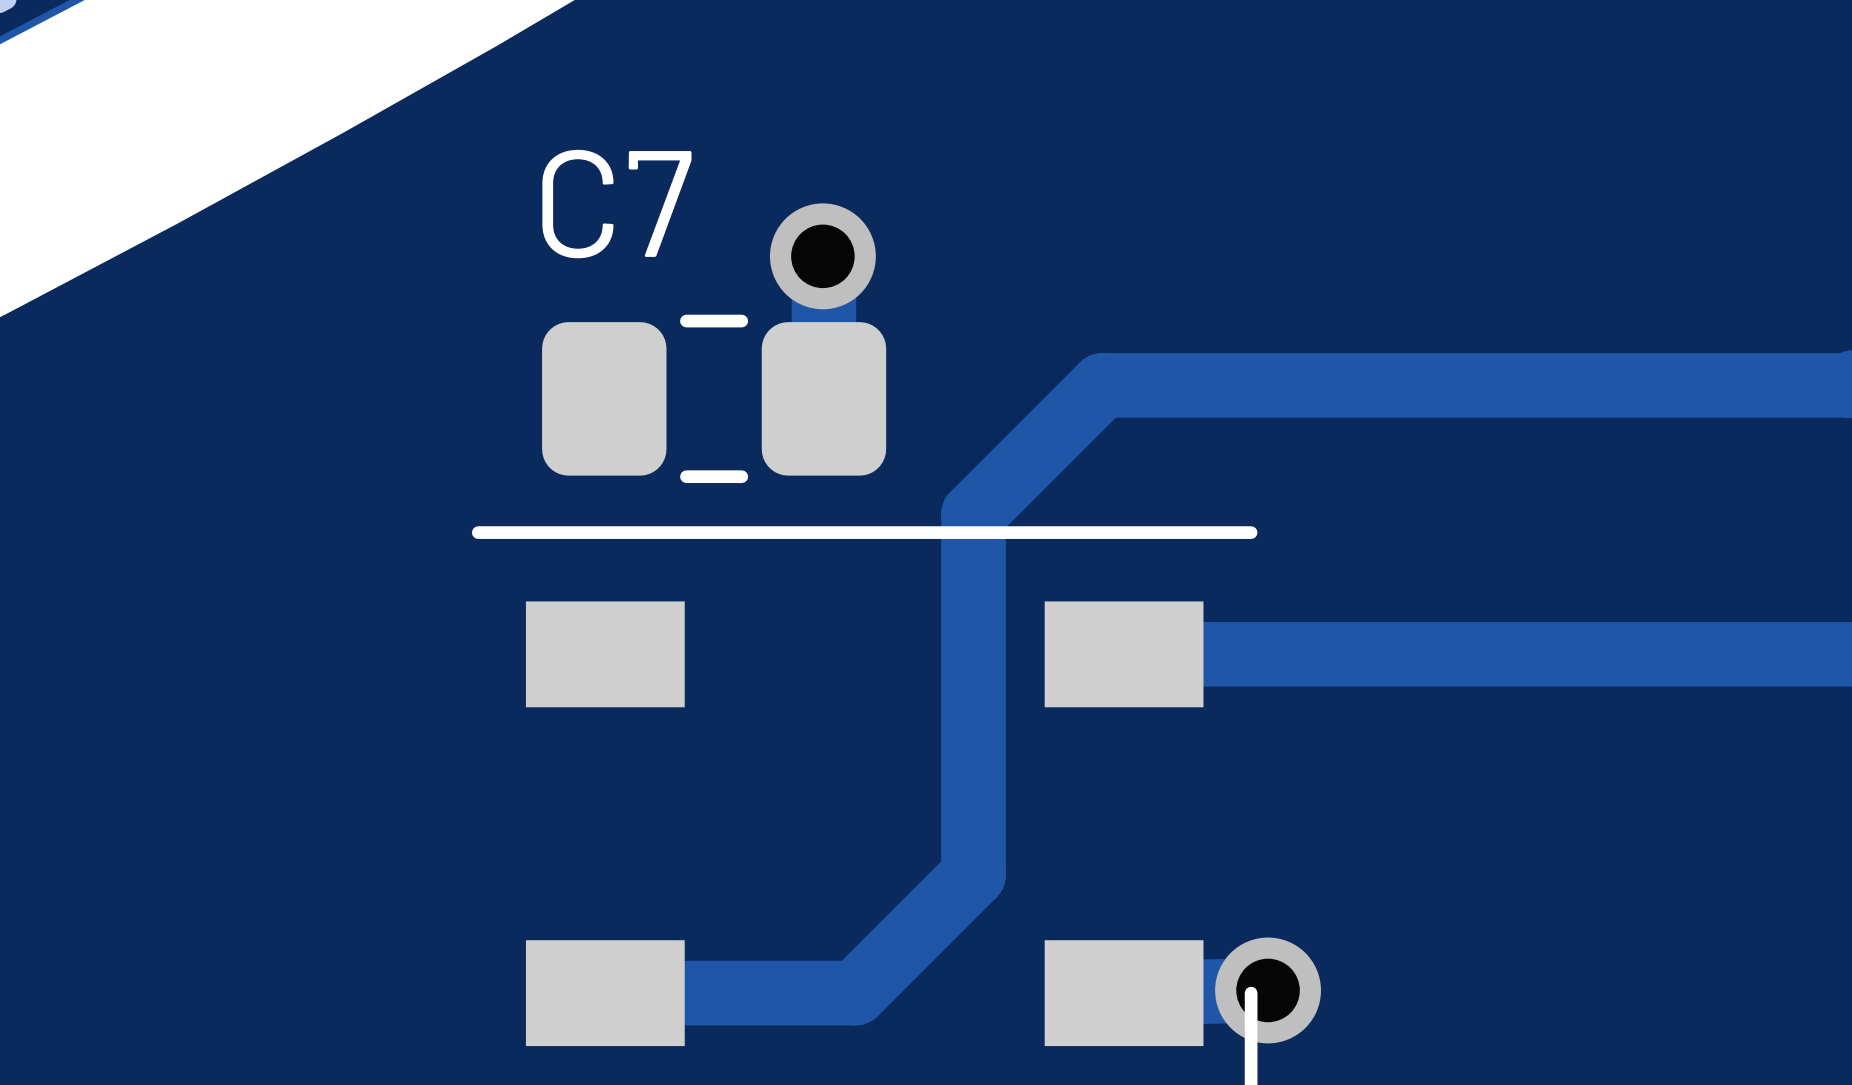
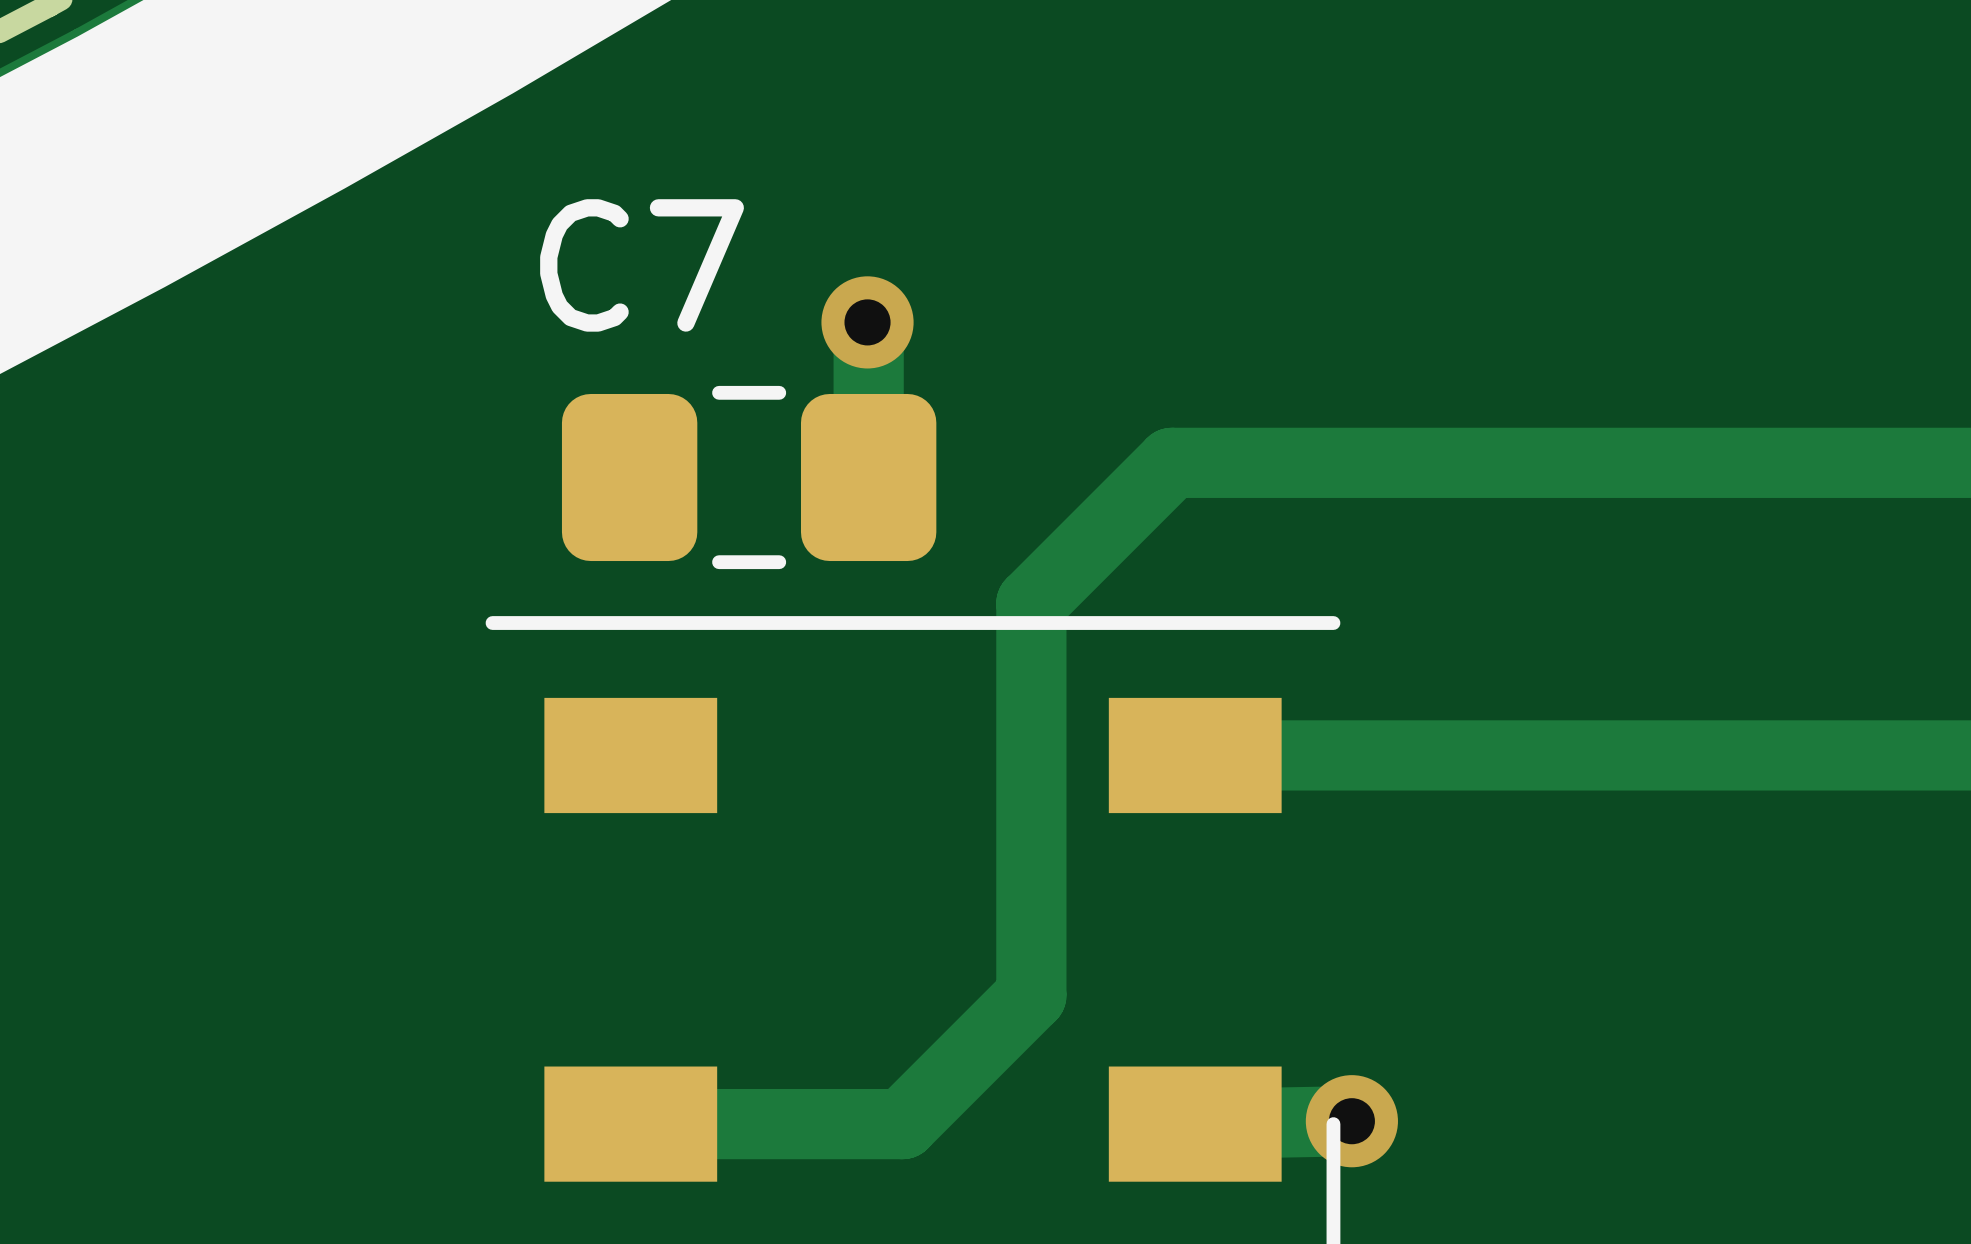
via size: [769, 203, 876, 310] -> [821, 276, 914, 369]
via size: [1215, 937, 1321, 1044] -> [1305, 1075, 1398, 1168]

